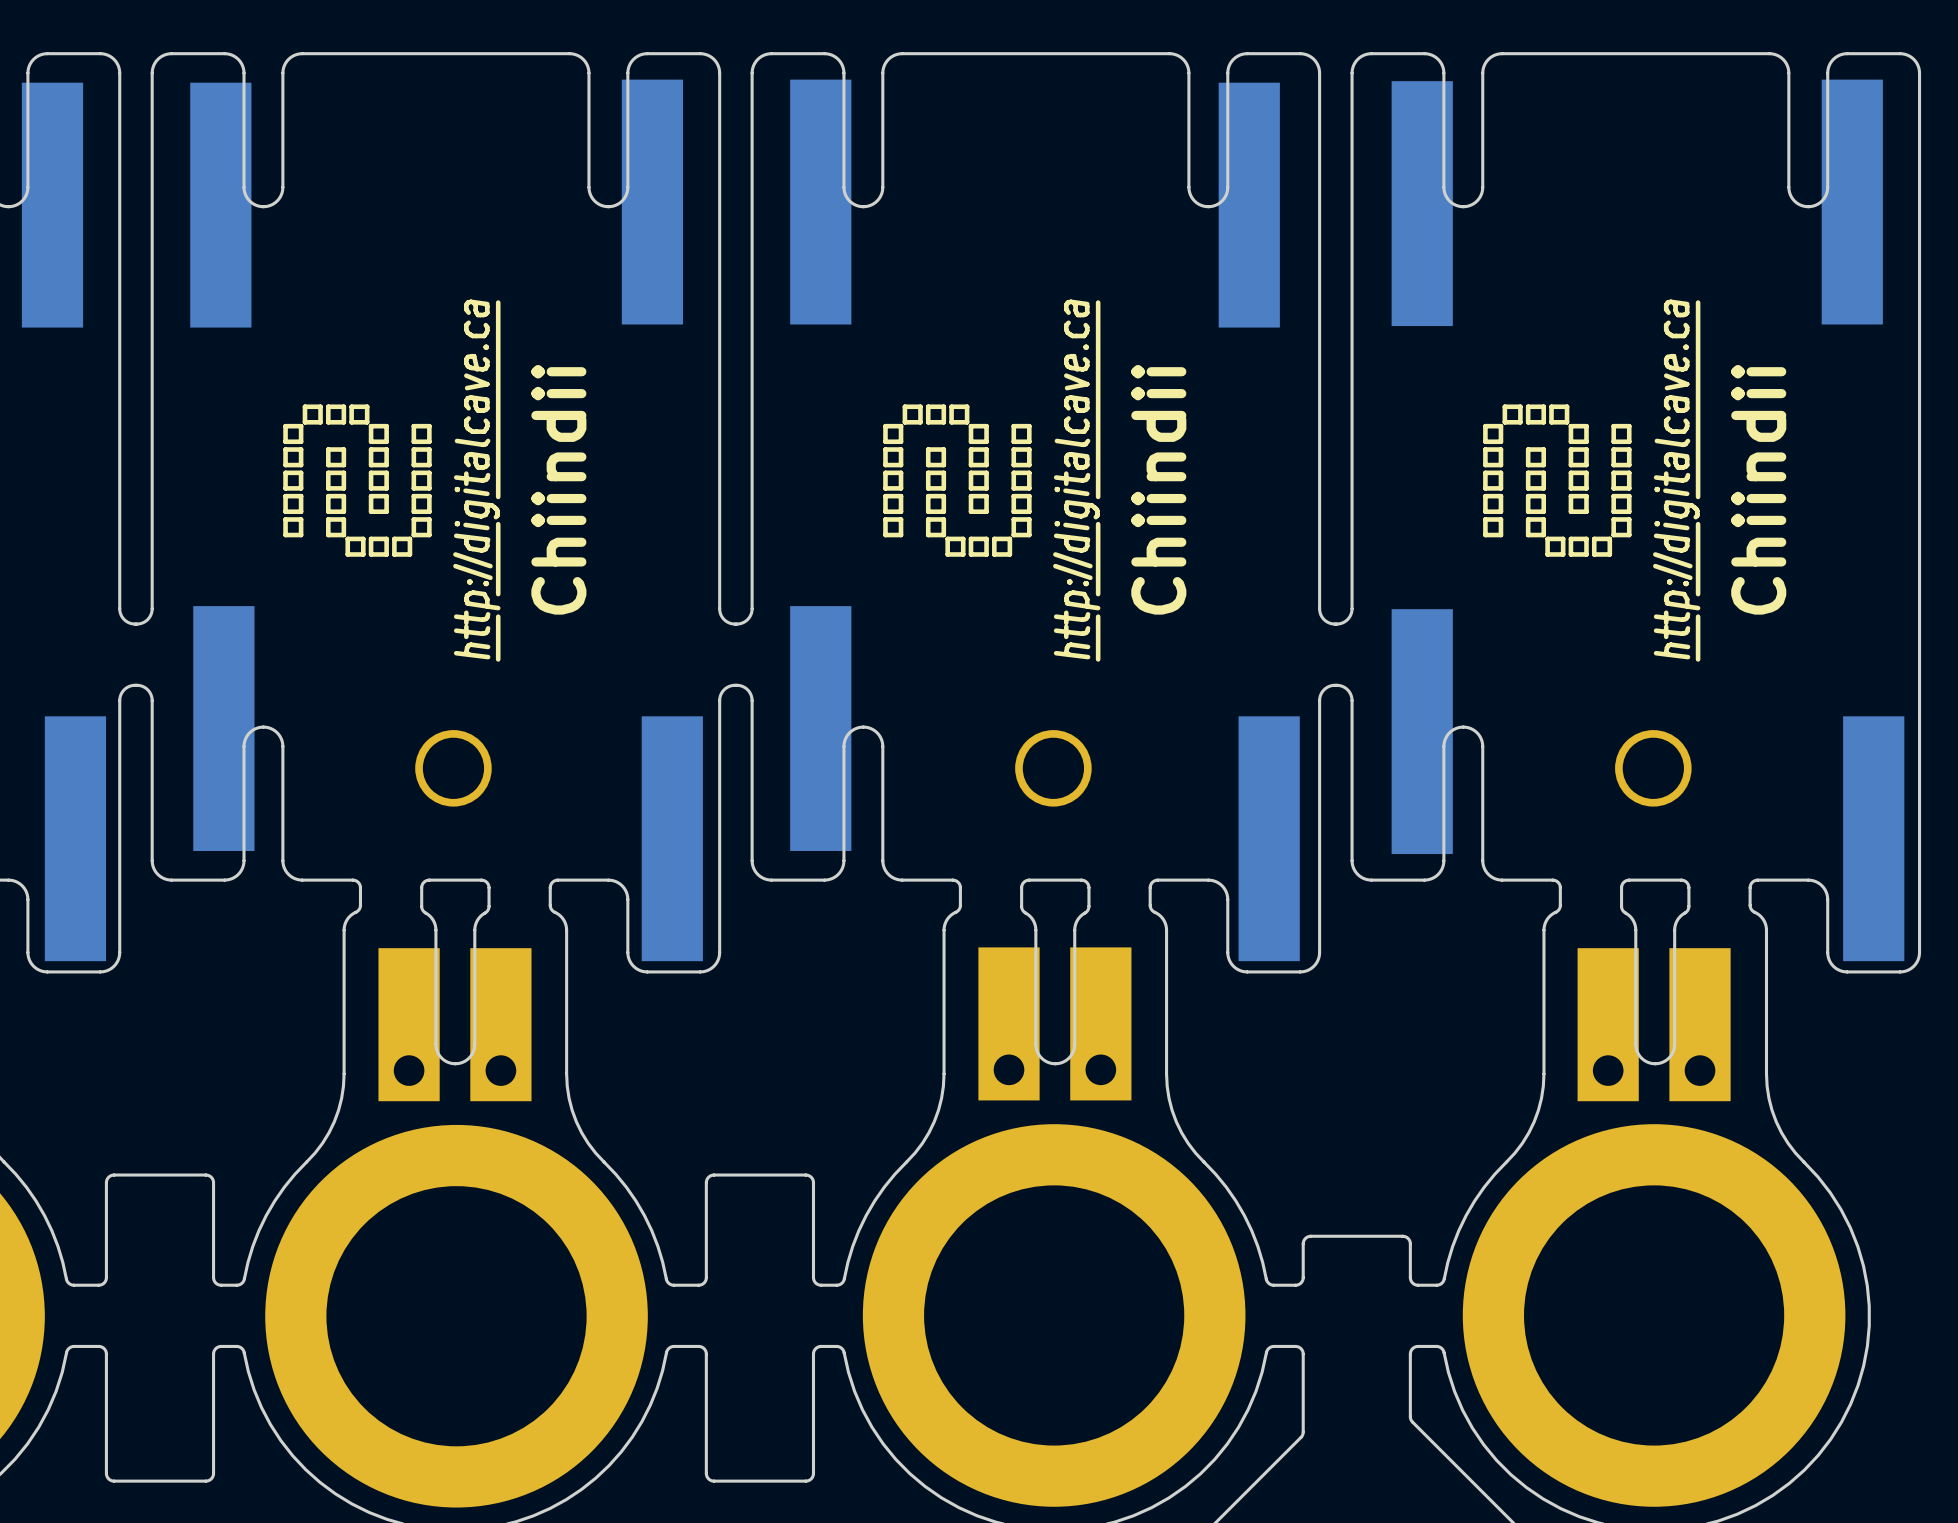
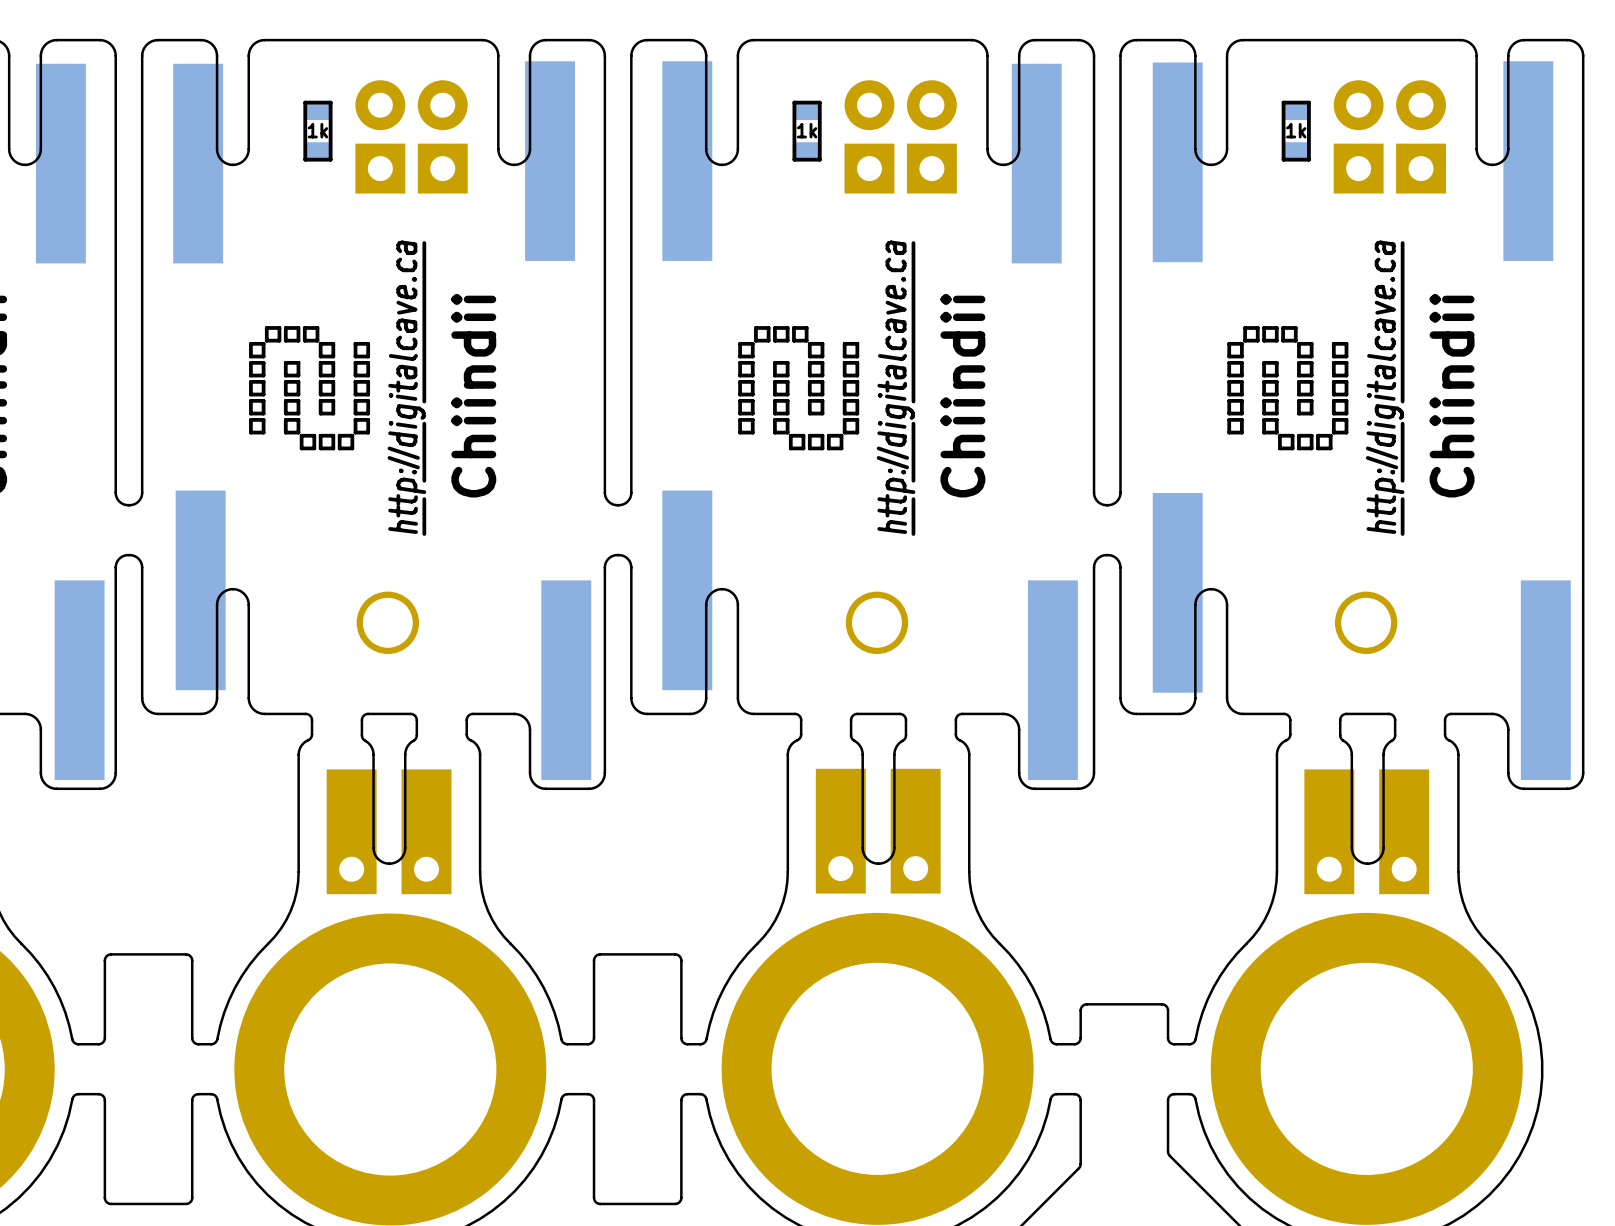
part: none -> 1k (317, 131)
part: none -> 1k (807, 131)
part: none -> 1k (1296, 131)
part: none -> (380, 136)
part: none -> (442, 136)
part: none -> (869, 136)
part: none -> (931, 136)
part: none -> (1358, 136)
part: none -> (1421, 136)

